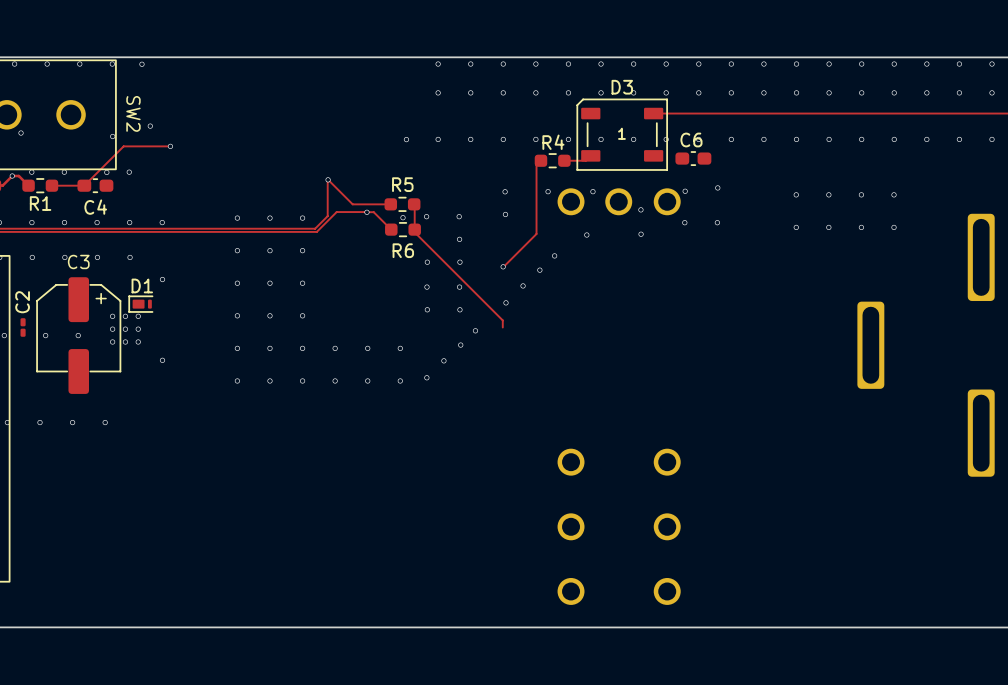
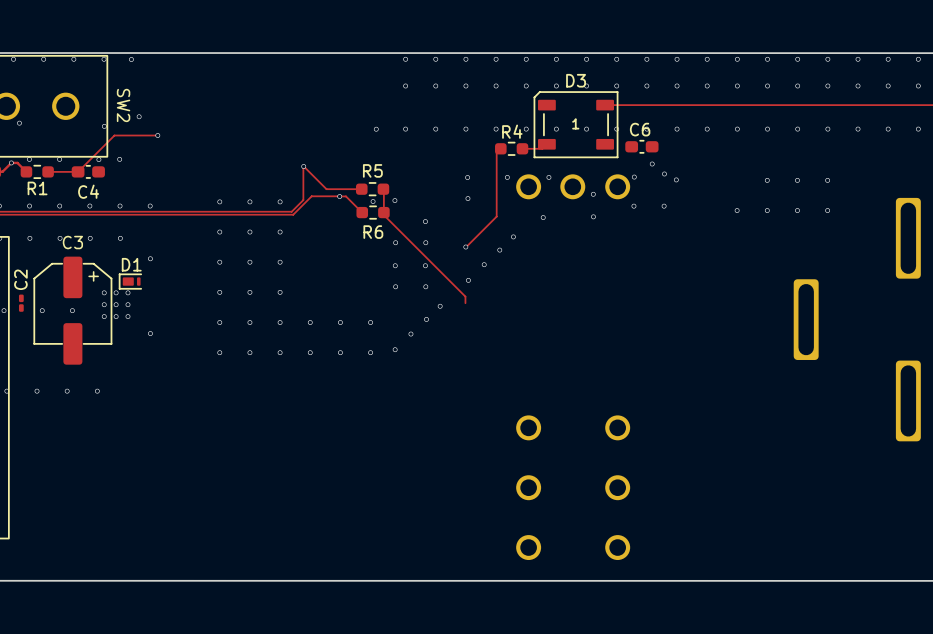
via: none -> (652, 164)
via: none -> (676, 179)
via: (796, 194) -> none
via: (459, 216) -> none

